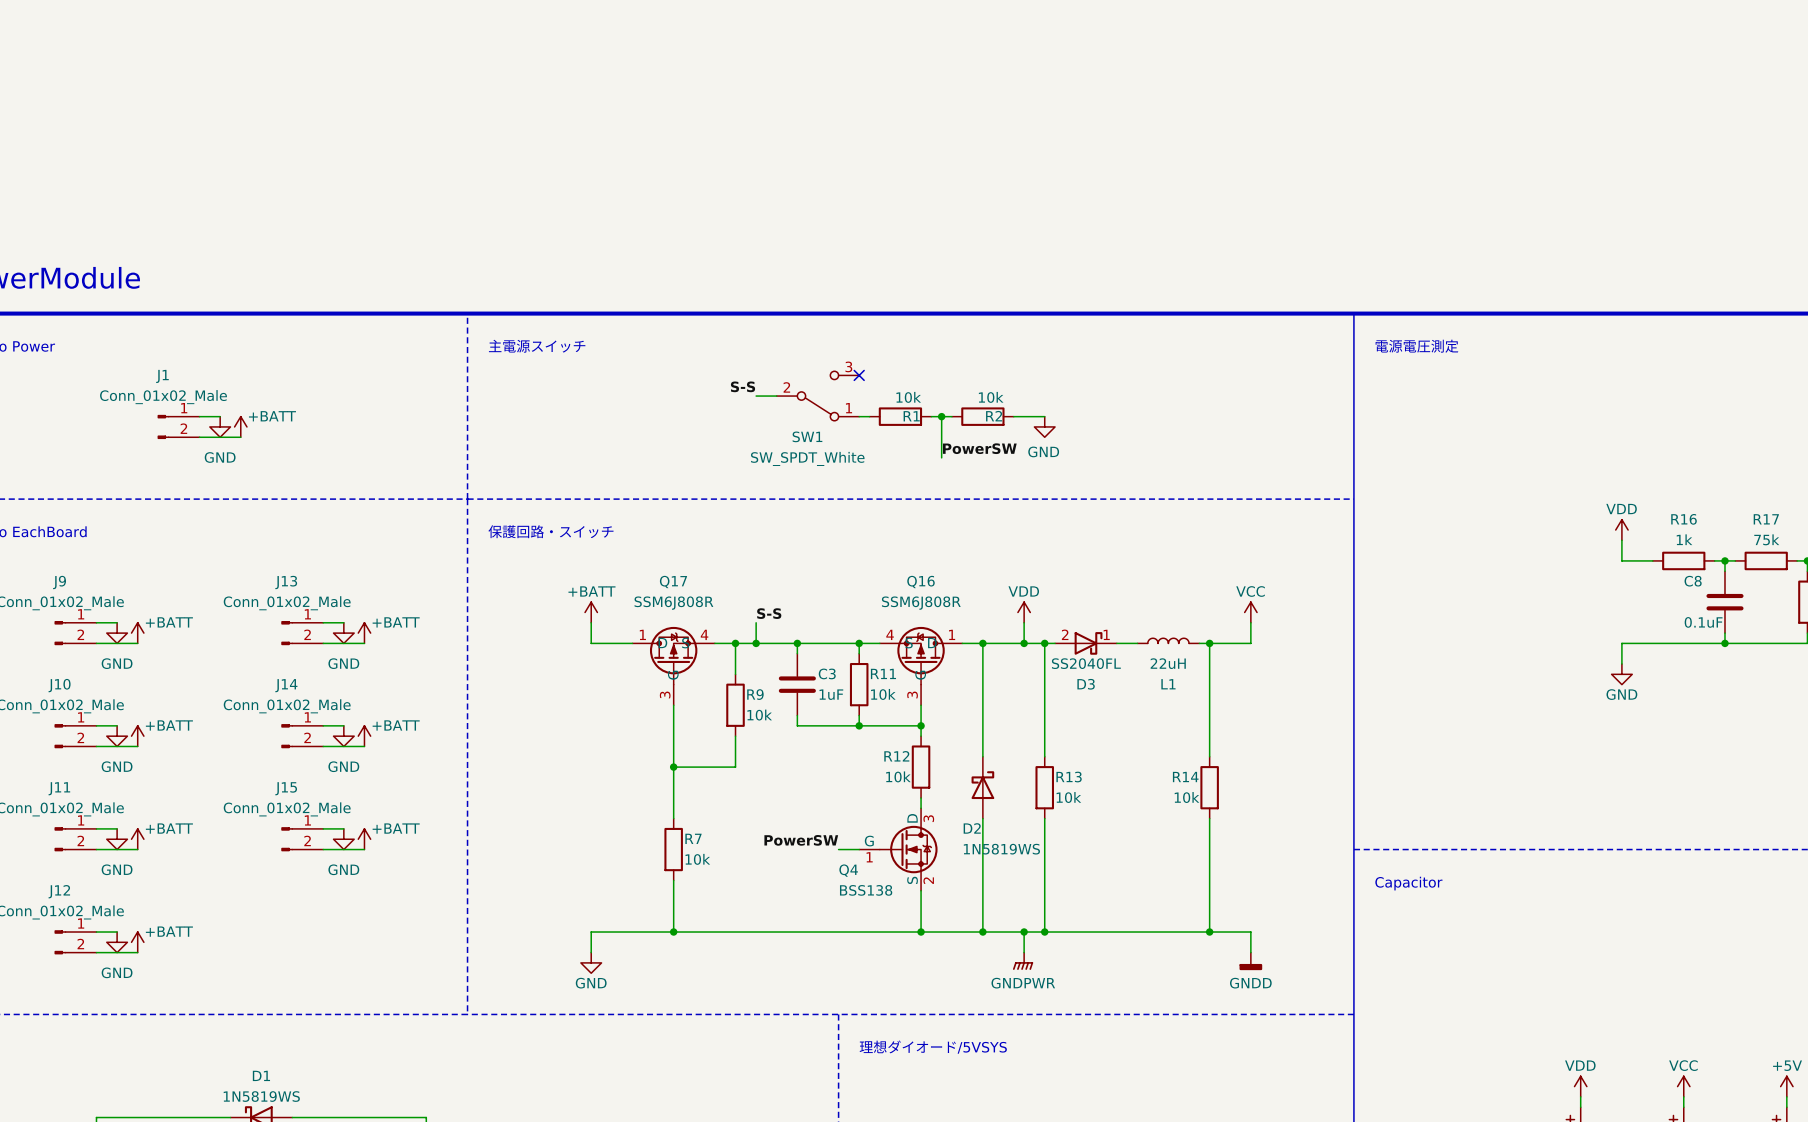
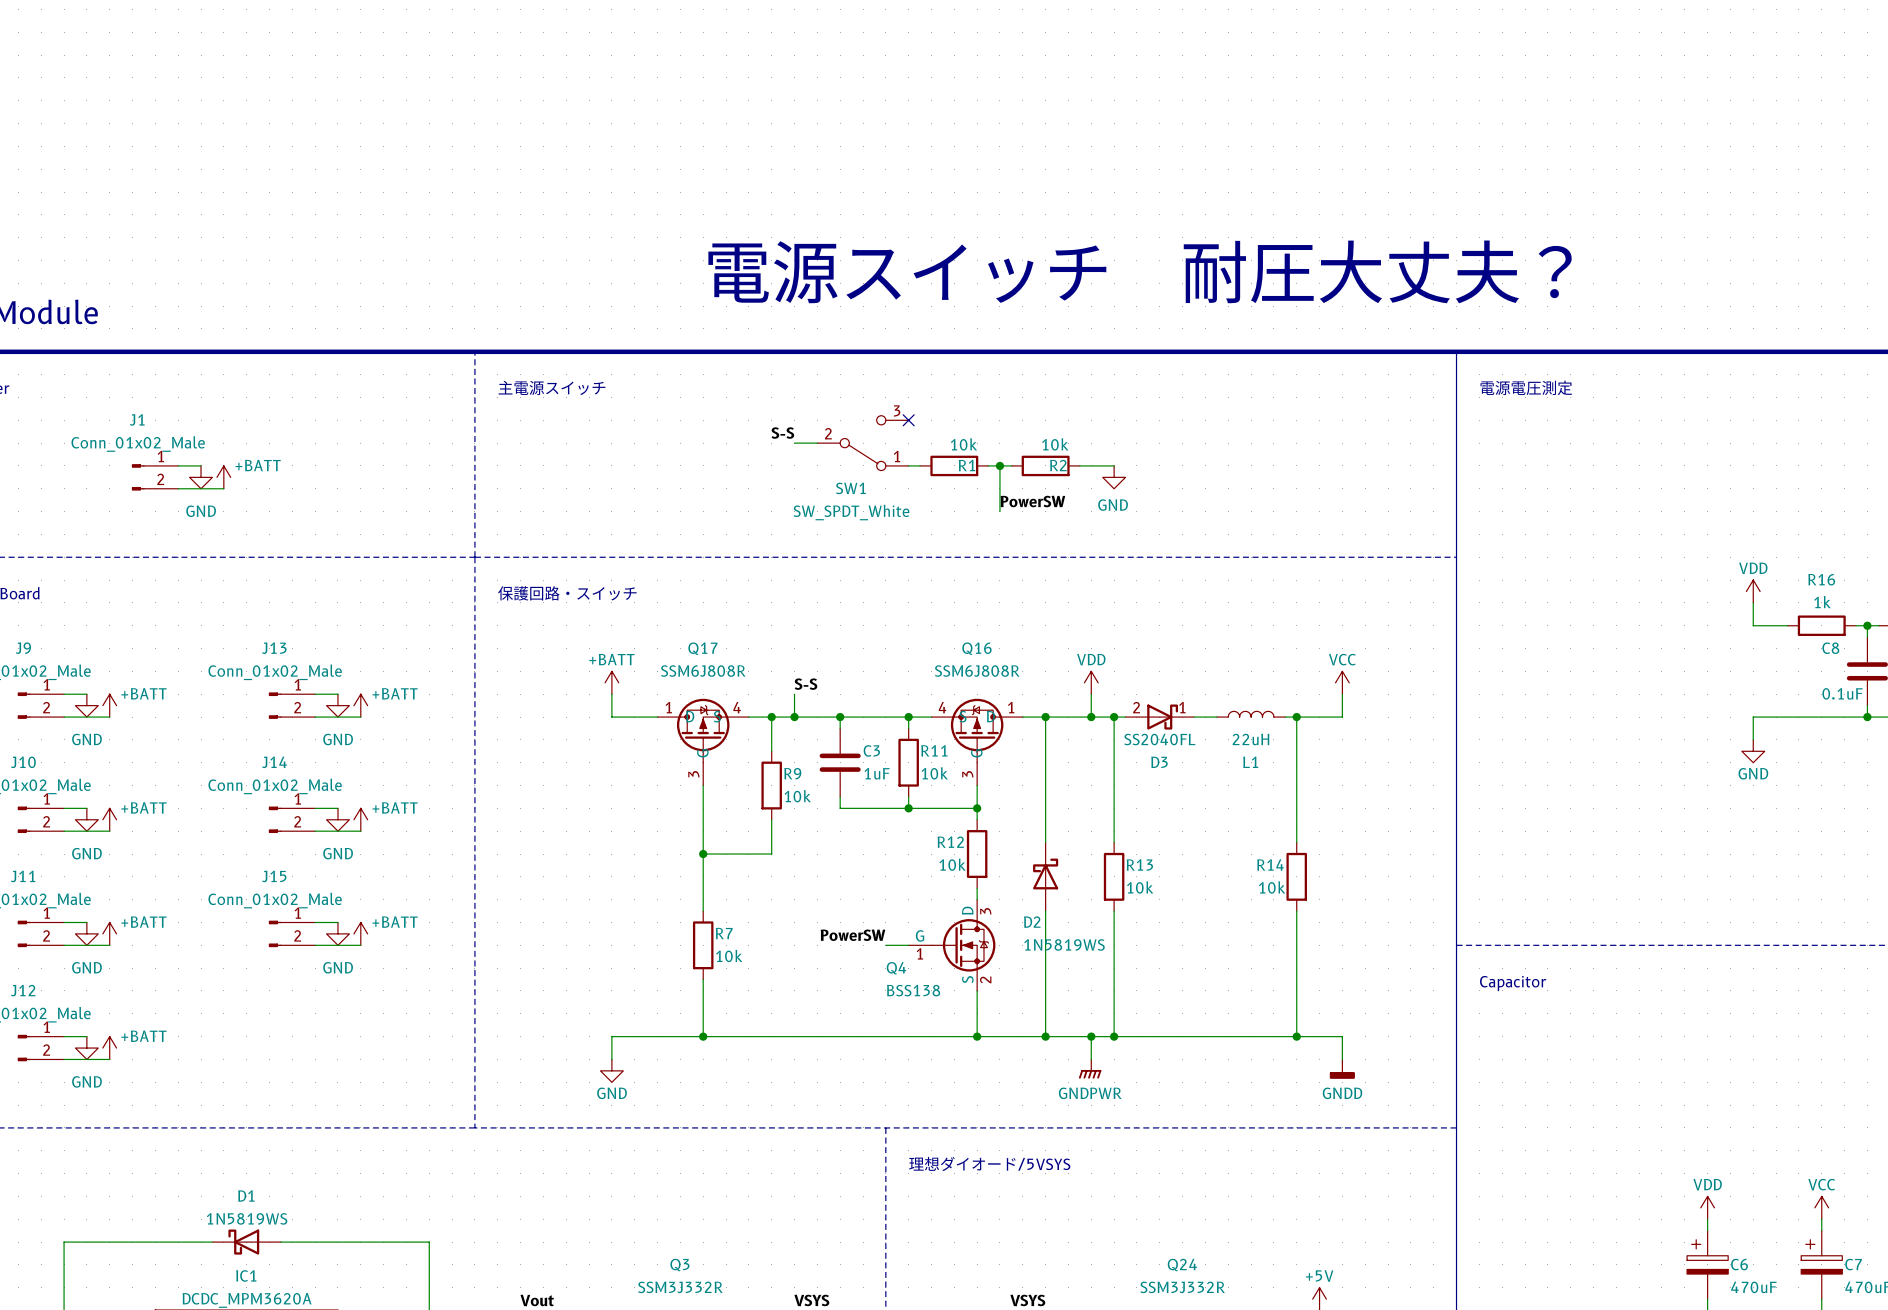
text: none -> 電源スイッチ 耐圧大丈夫？ (1140, 271)

